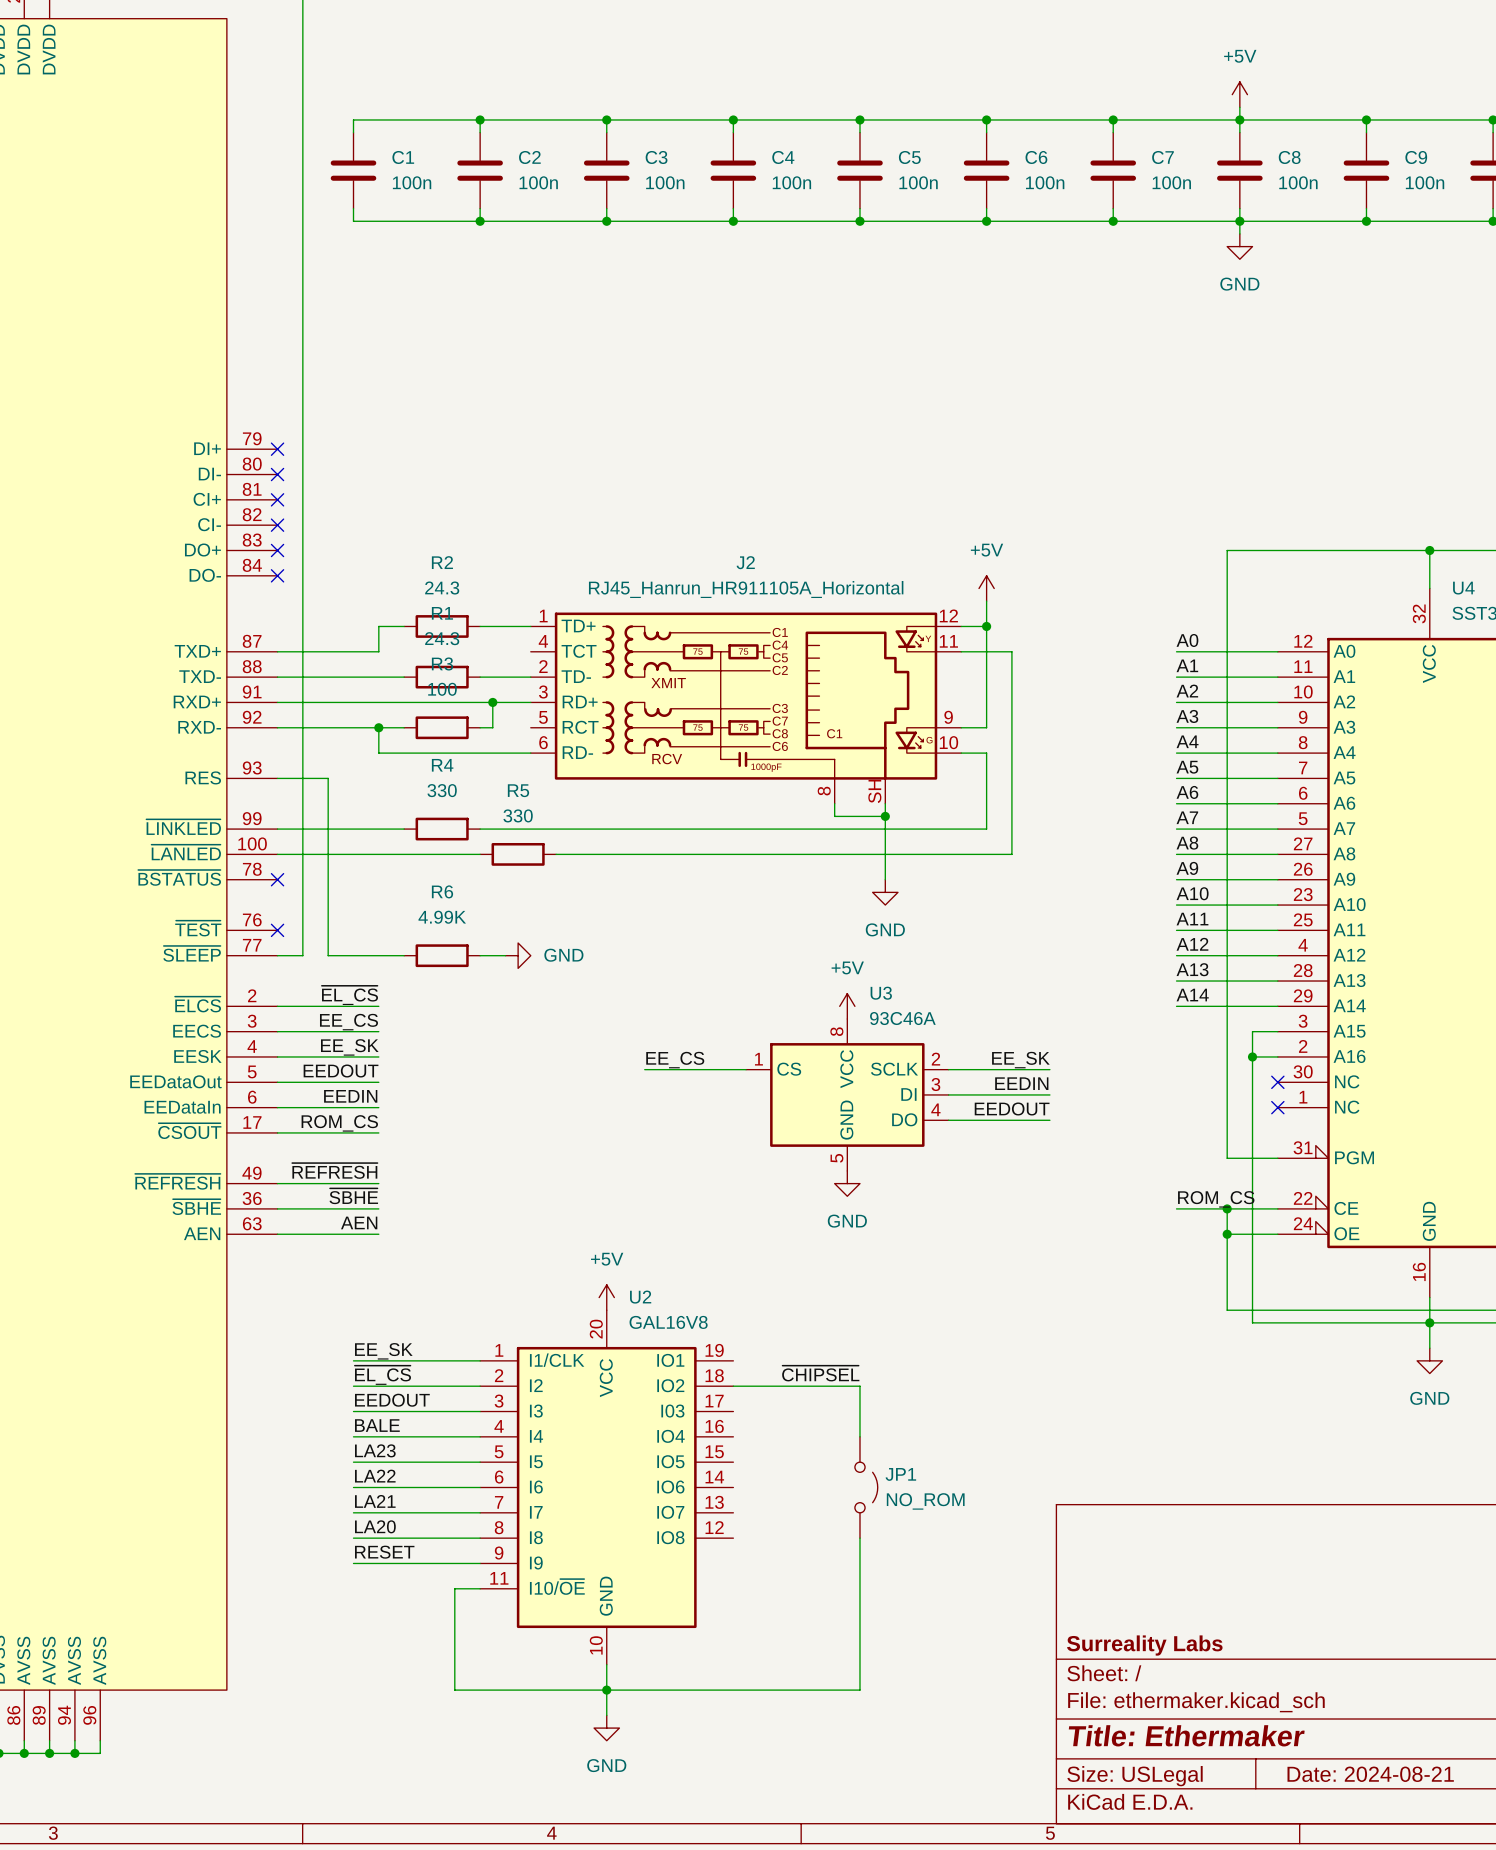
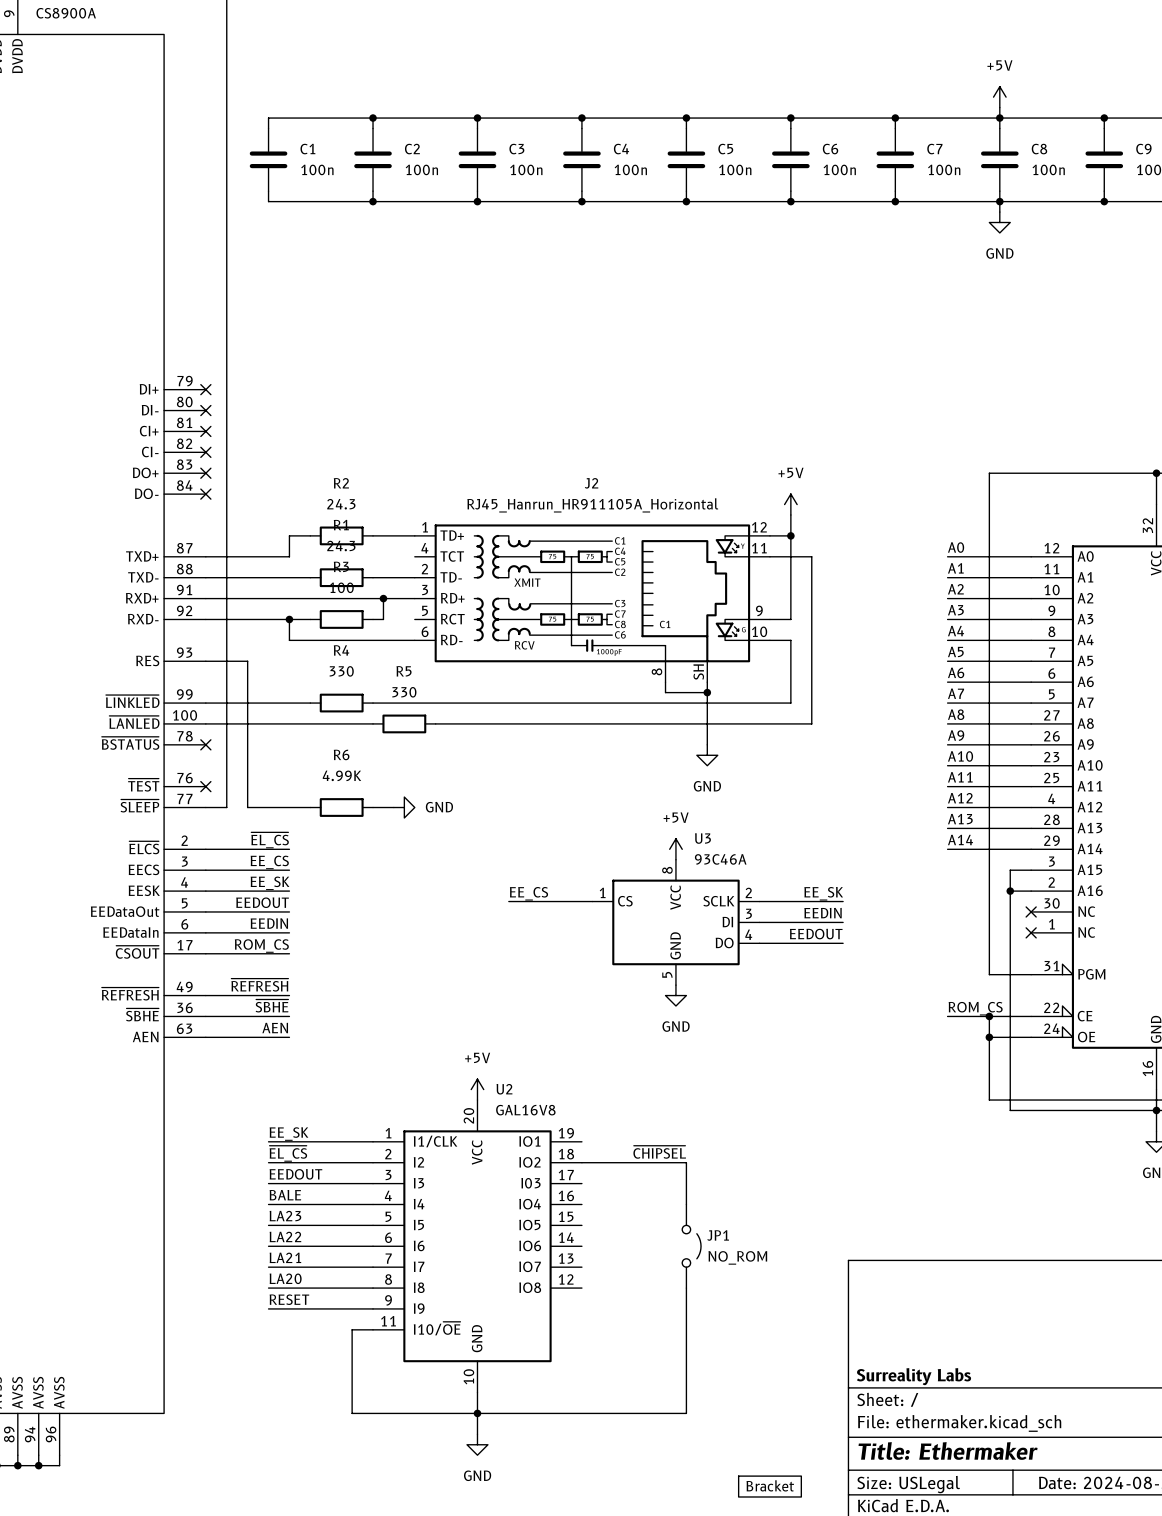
part: none -> (769, 1486)

